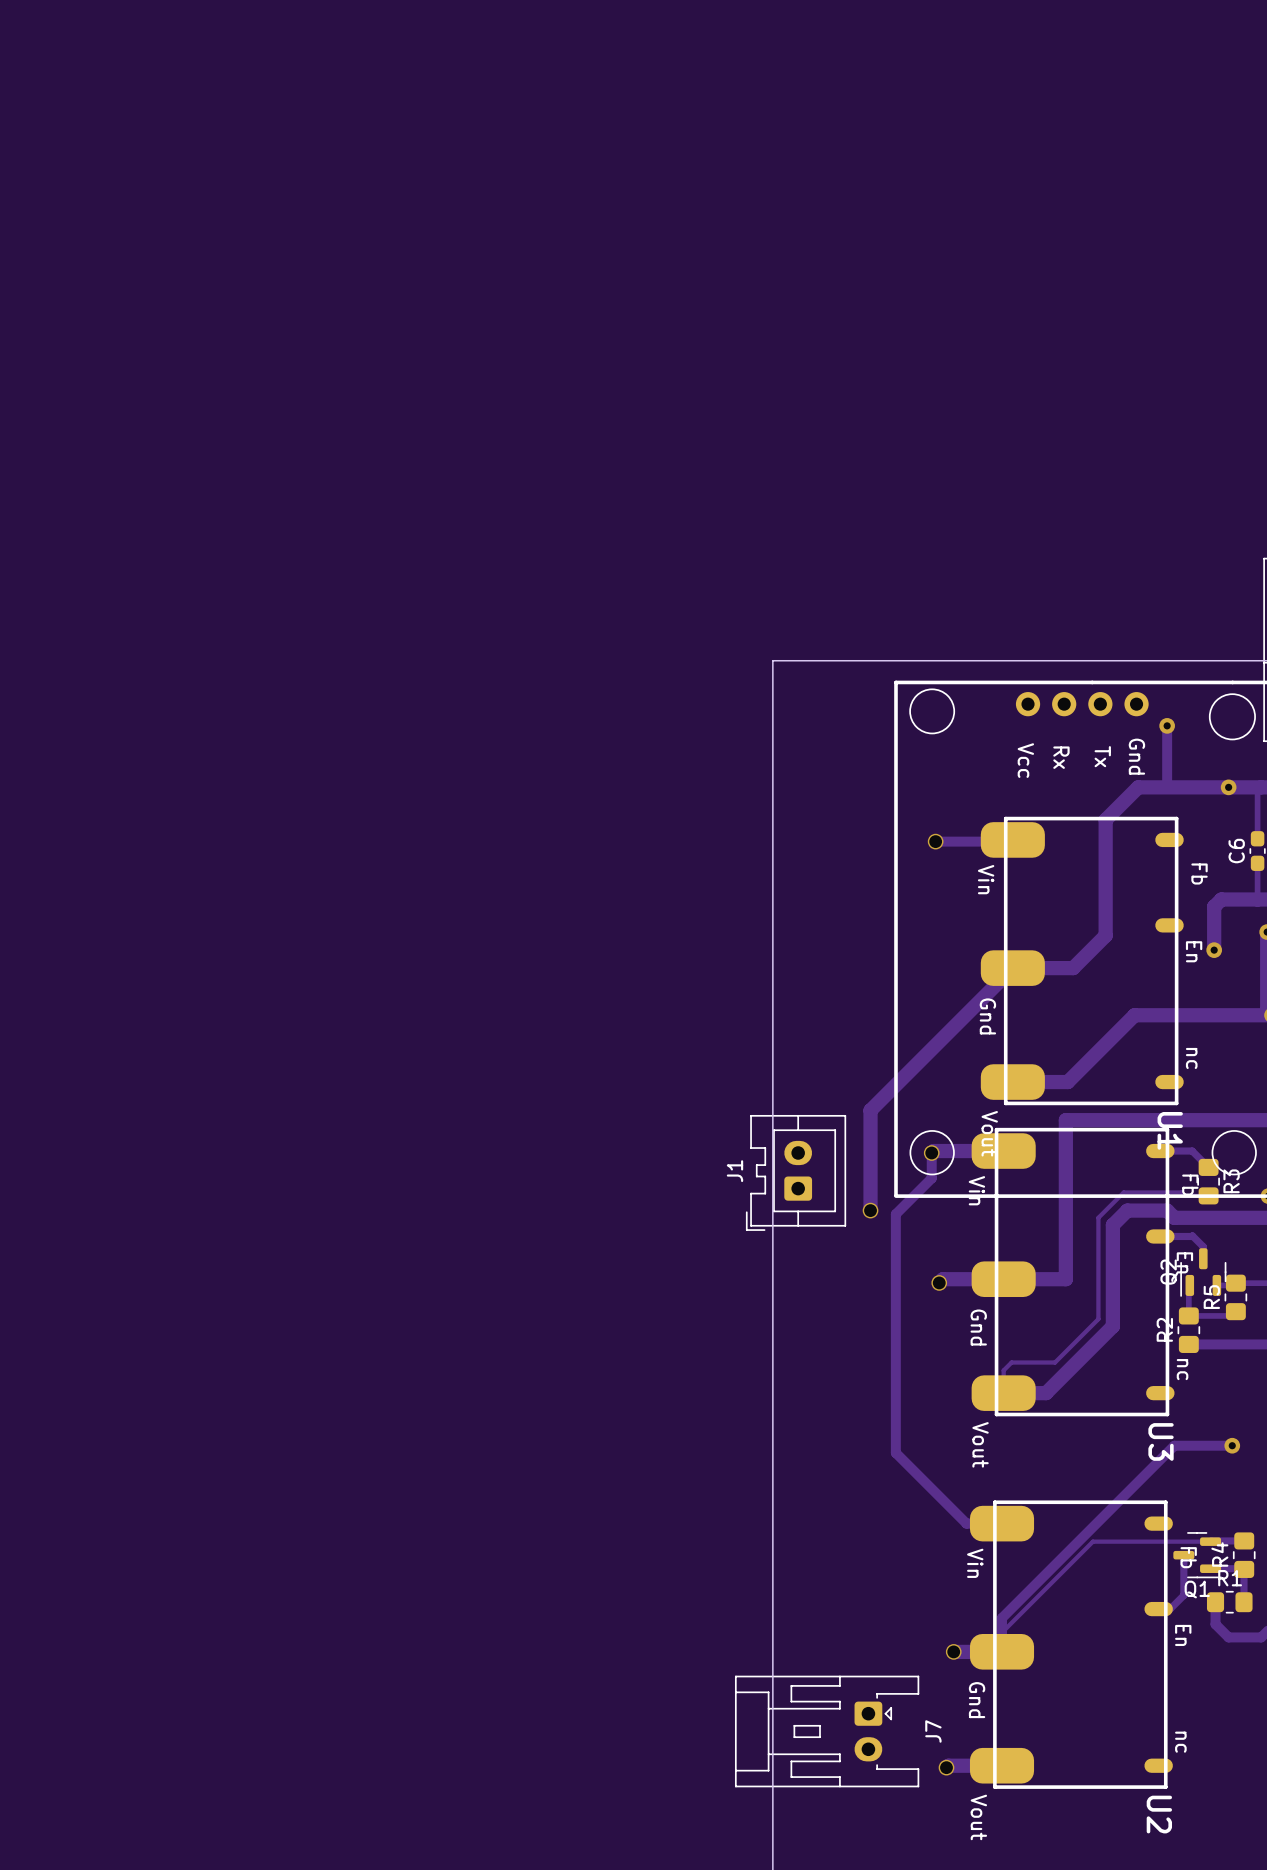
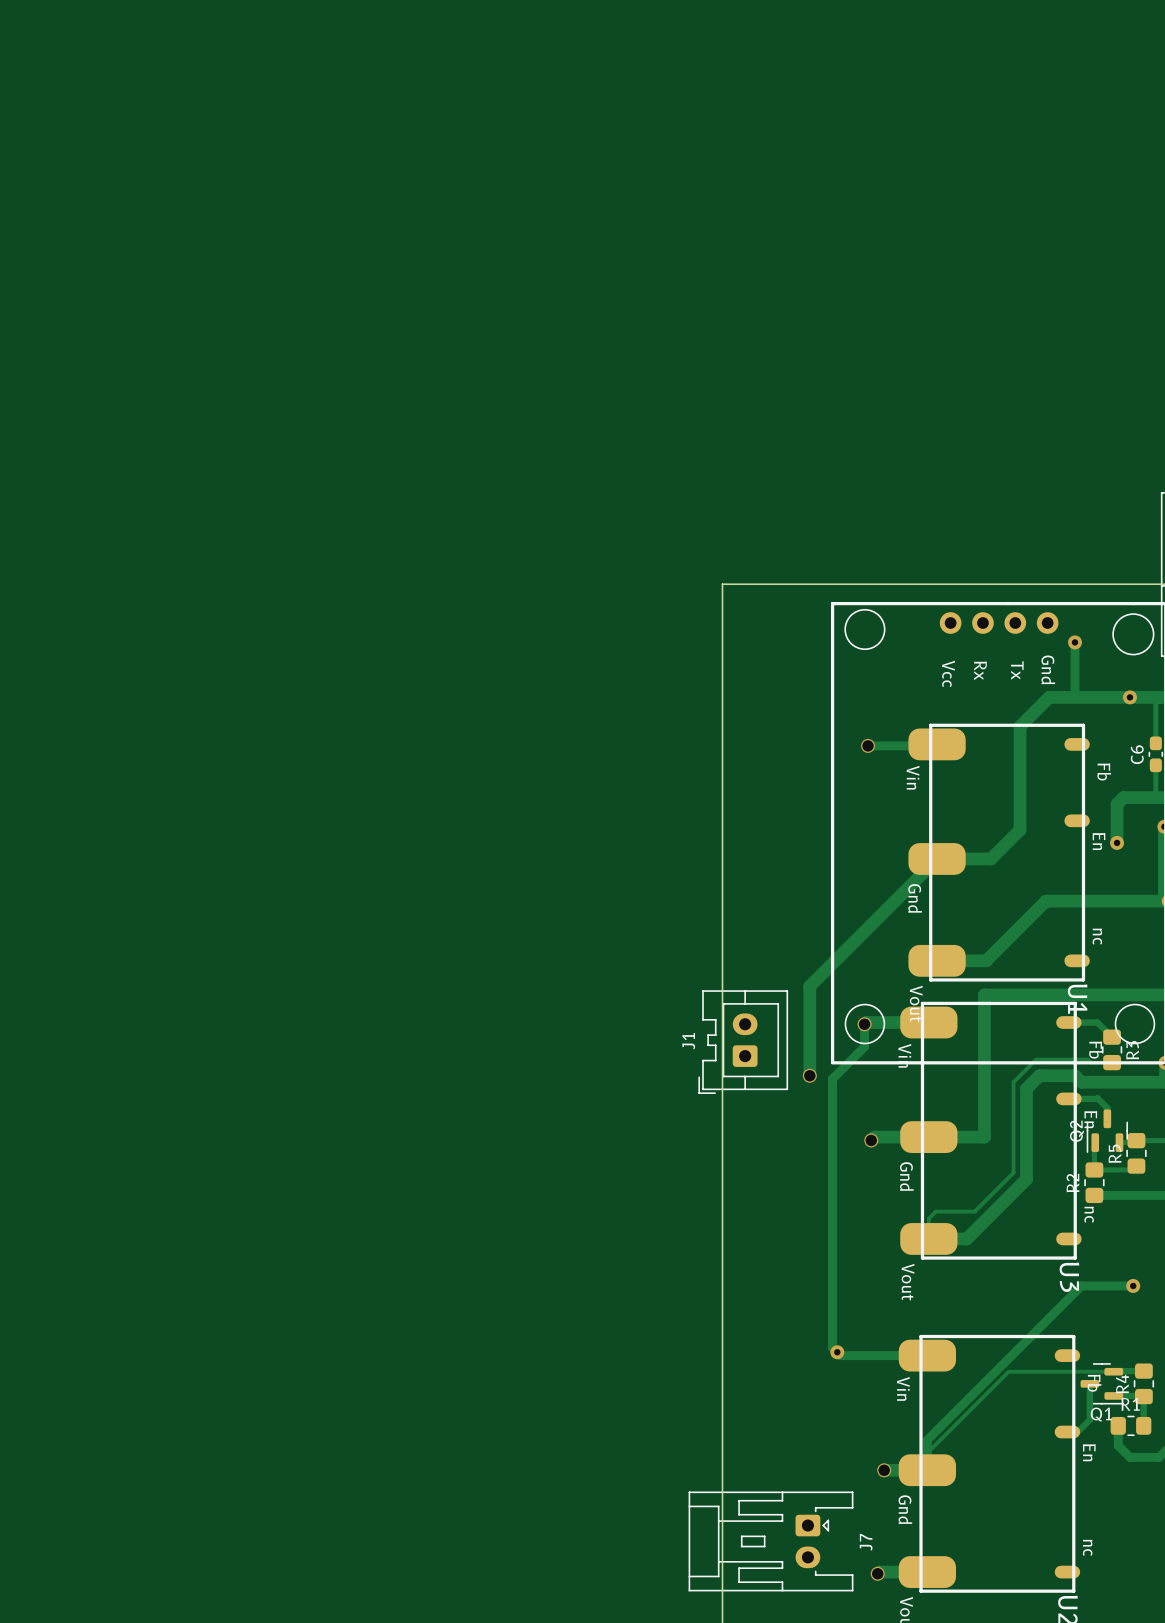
track: (895, 1452) (966, 1523) -> (832, 1292) (832, 1347) (840, 1355) (895, 1355)
via: none -> (837, 1352)

